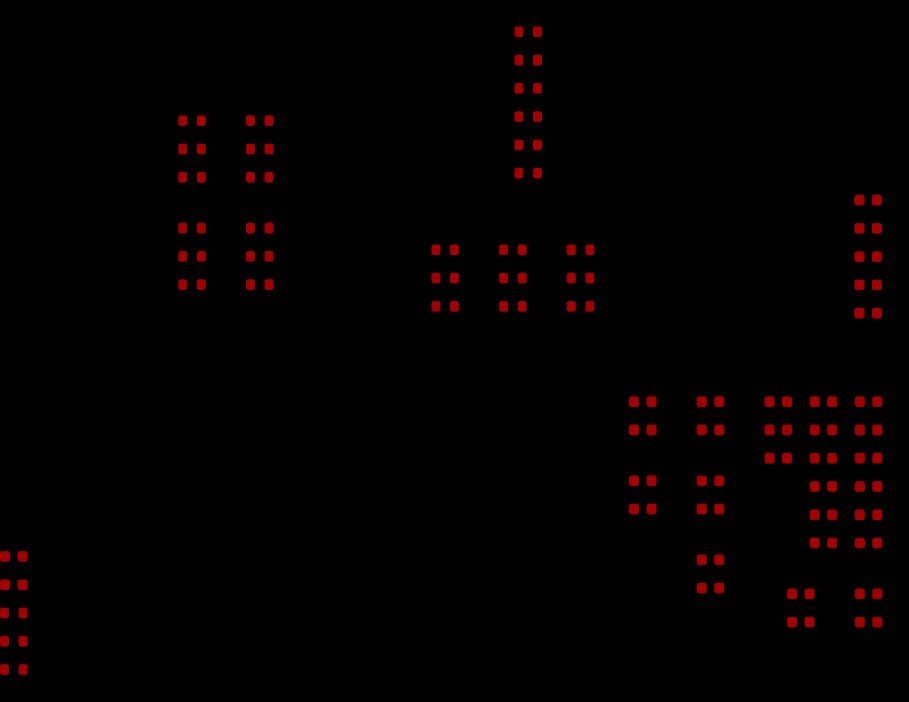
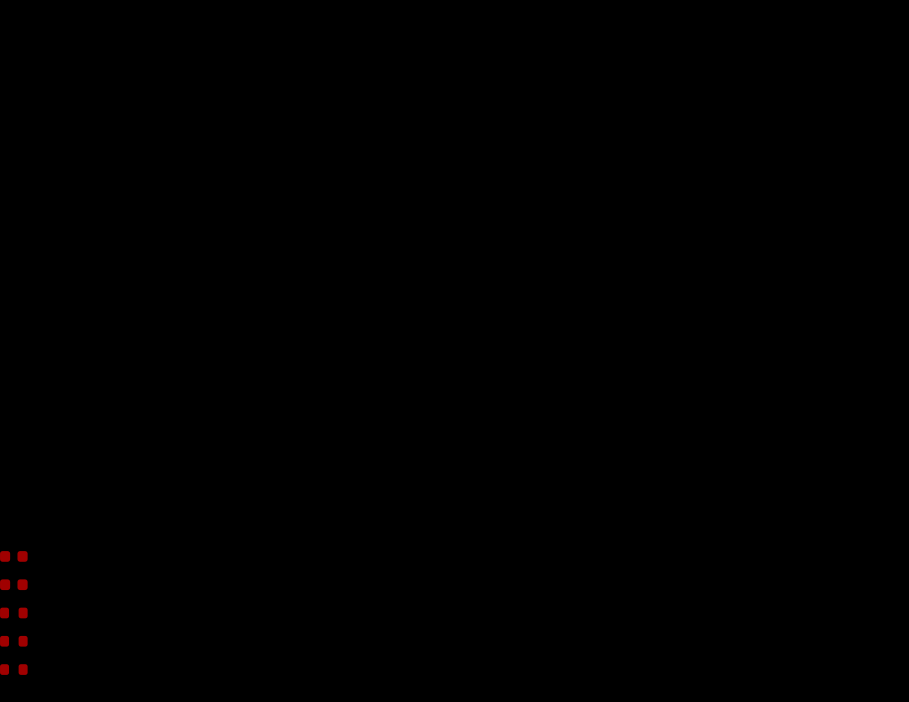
part: (528, 31) -> none
part: (528, 60) -> none
part: (528, 88) -> none
part: (528, 116) -> none
part: (192, 120) -> none
part: (259, 120) -> none
part: (528, 144) -> none
part: (192, 148) -> none
part: (259, 148) -> none
part: (528, 173) -> none
part: (192, 177) -> none
part: (259, 177) -> none
part: (868, 200) -> none
part: (192, 228) -> none
part: (259, 228) -> none
part: (868, 228) -> none
part: (445, 249) -> none
part: (512, 249) -> none
part: (580, 249) -> none
part: (192, 256) -> none
part: (259, 256) -> none
part: (868, 256) -> none
part: (445, 278) -> none
part: (512, 278) -> none
part: (580, 278) -> none
part: (192, 284) -> none
part: (259, 284) -> none
part: (868, 284) -> none
part: (445, 306) -> none
part: (512, 306) -> none
part: (580, 306) -> none
part: (868, 313) -> none
part: (642, 401) -> none
part: (710, 401) -> none
part: (778, 401) -> none
part: (823, 401) -> none
part: (868, 401) -> none
part: (642, 429) -> none
part: (710, 429) -> none
part: (778, 429) -> none
part: (823, 429) -> none
part: (868, 429) -> none
part: (778, 458) -> none
part: (823, 458) -> none
part: (868, 458) -> none
part: (642, 480) -> none
part: (710, 480) -> none
part: (823, 486) -> none
part: (868, 486) -> none
part: (642, 509) -> none
part: (710, 509) -> none
part: (823, 514) -> none
part: (868, 514) -> none
part: (823, 543) -> none
part: (868, 543) -> none
part: (710, 559) -> none
part: (710, 588) -> none
part: (800, 593) -> none
part: (868, 593) -> none
part: (800, 622) -> none
part: (868, 622) -> none

